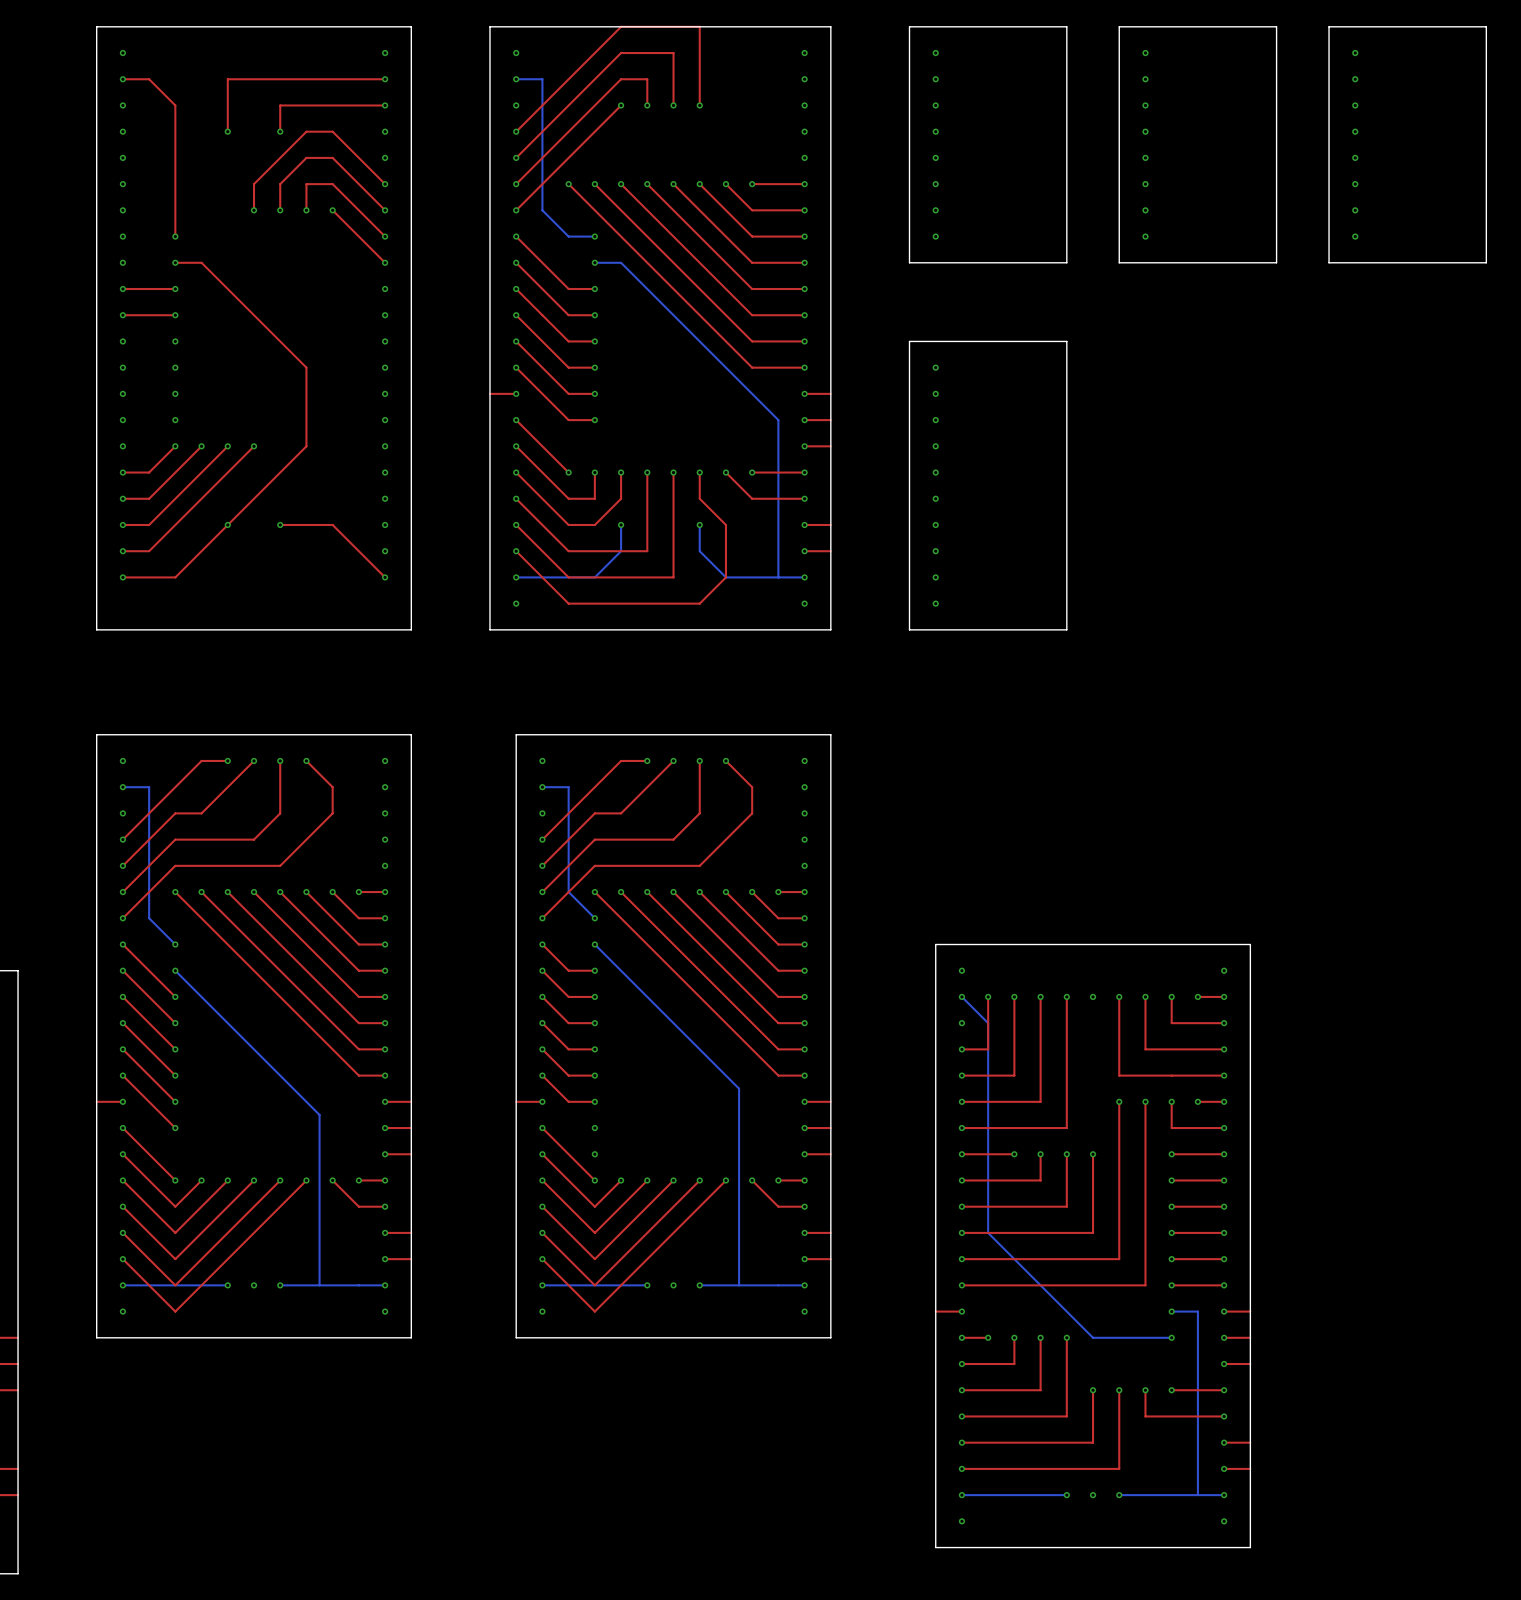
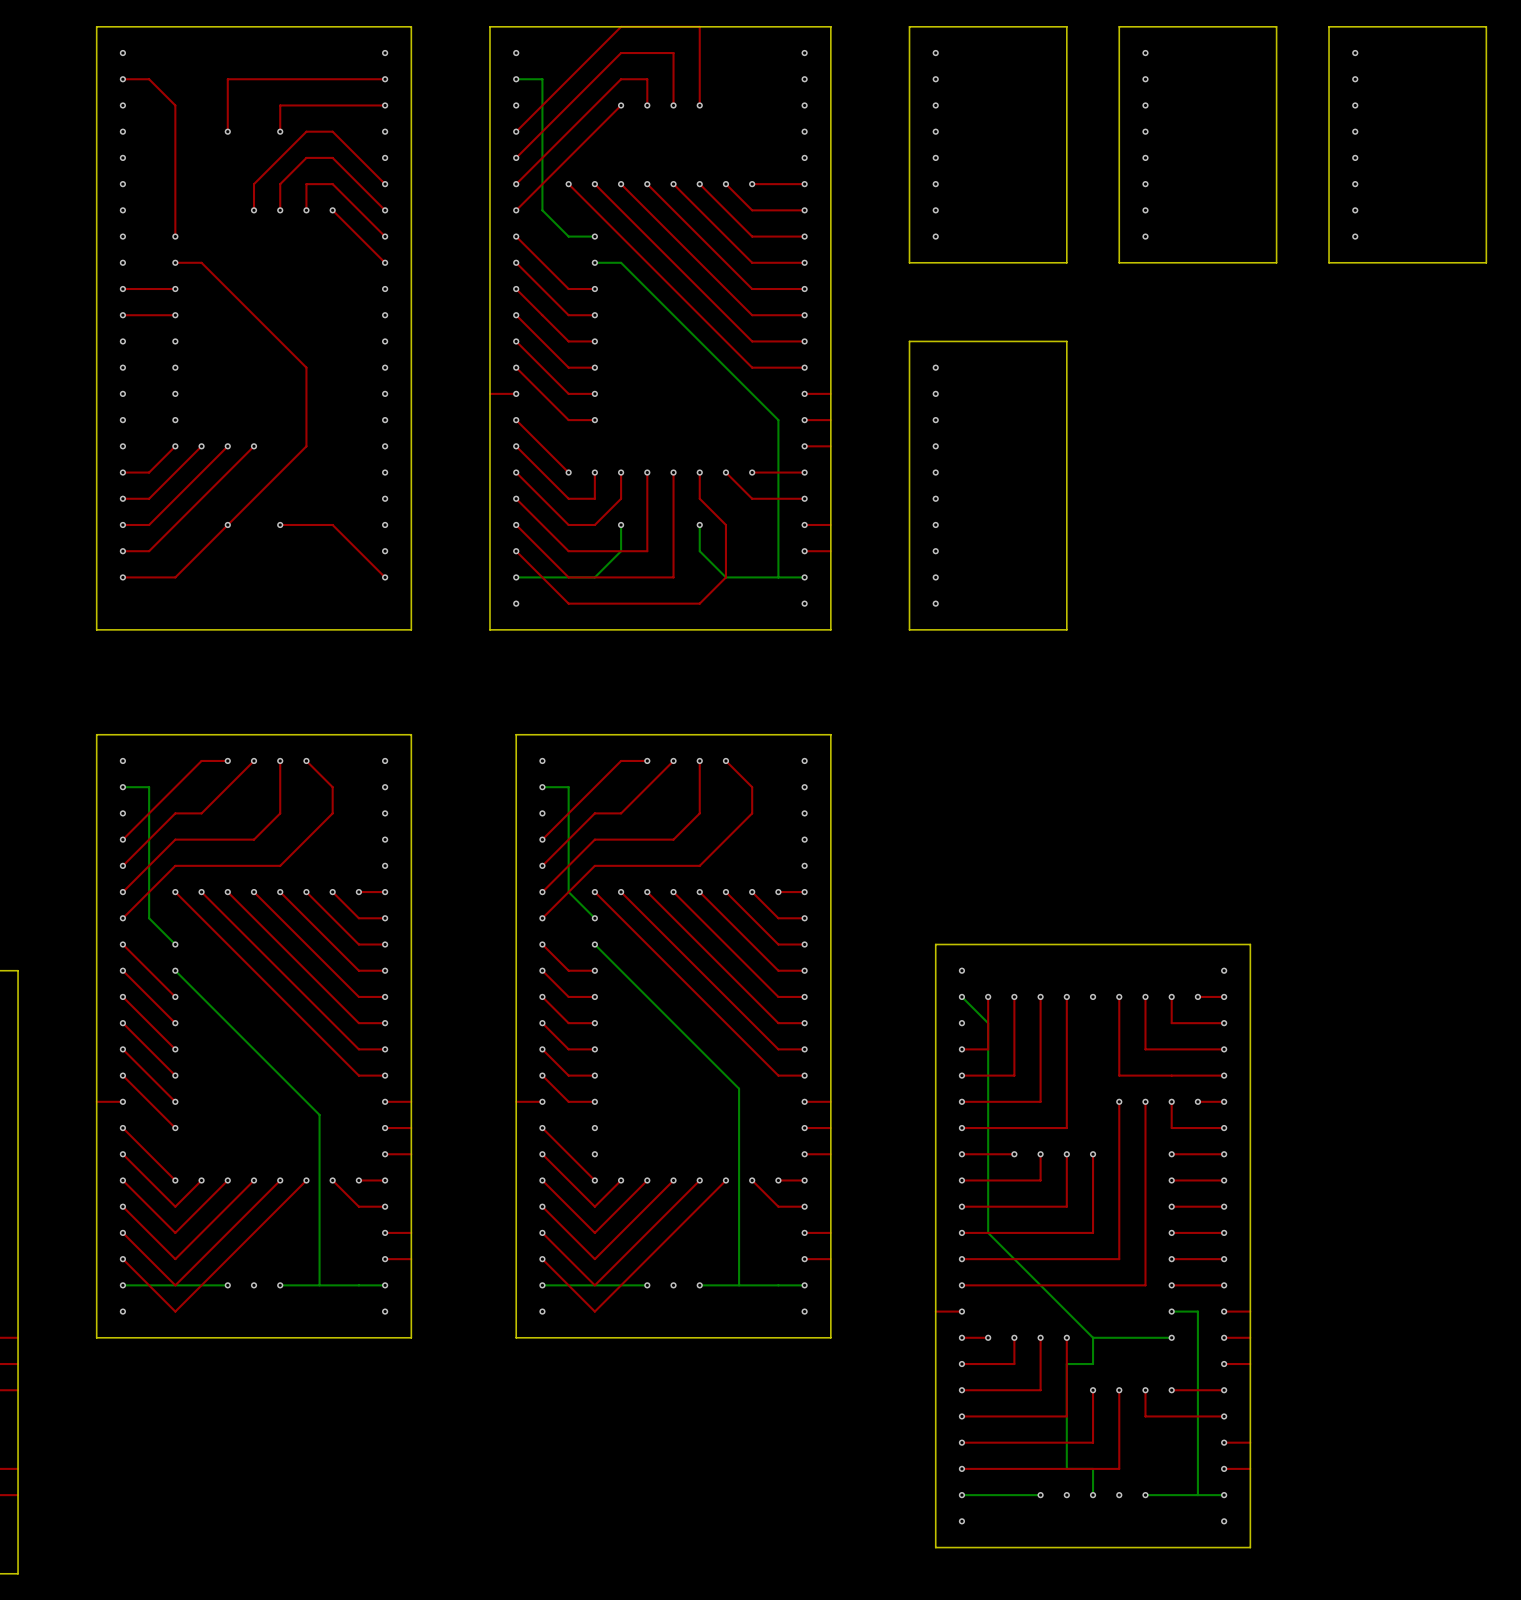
bottom track: none -> (1093, 1337) (1093, 1364) (1066, 1364) (1066, 1468) (1093, 1468) (1093, 1495)
bottom track: (1040, 1495) (1066, 1495) -> none
via: none -> (1040, 1495)
bottom track: (1119, 1495) (1145, 1495) -> none
via: none -> (1145, 1495)

